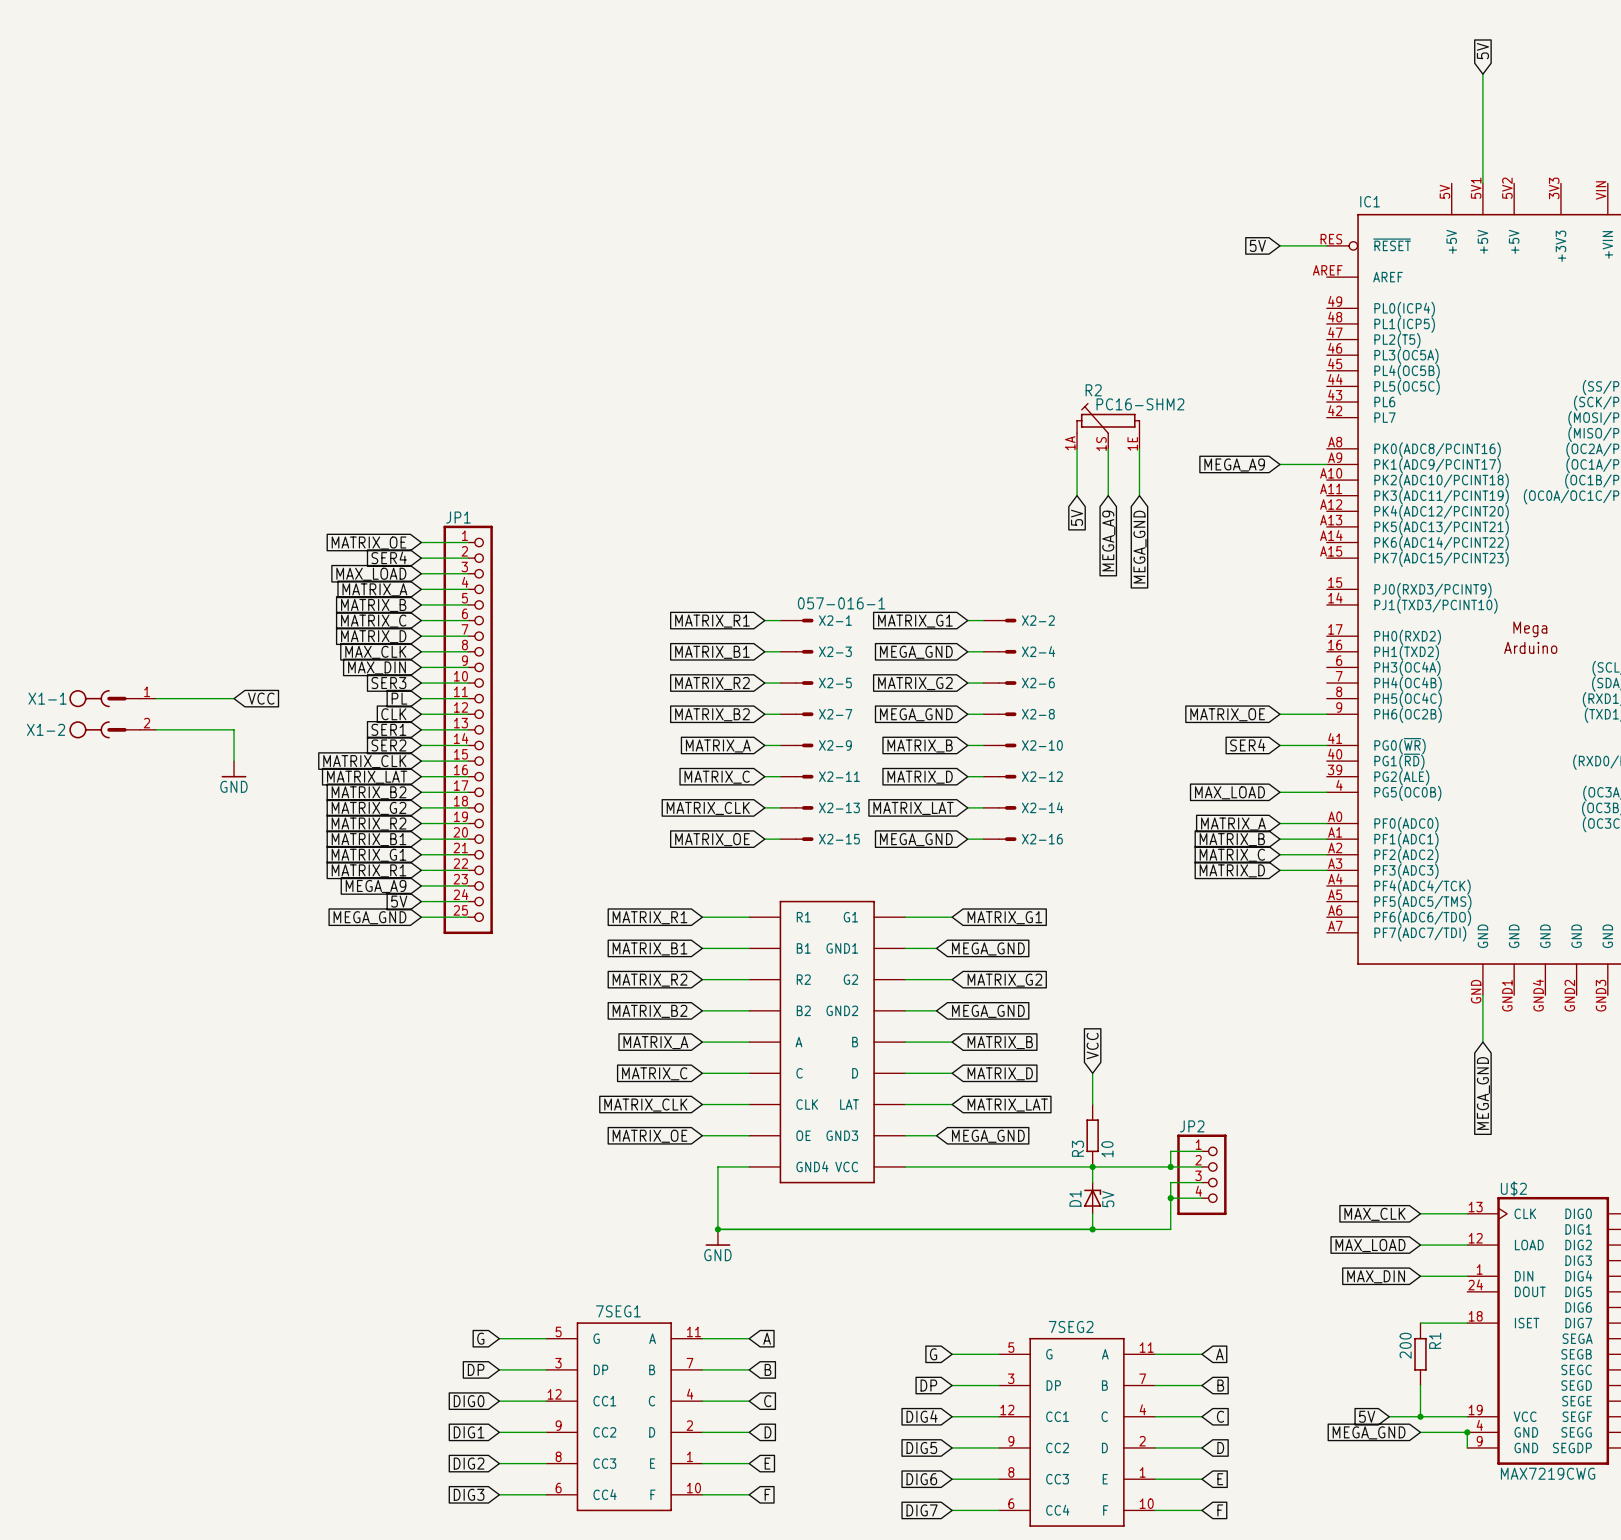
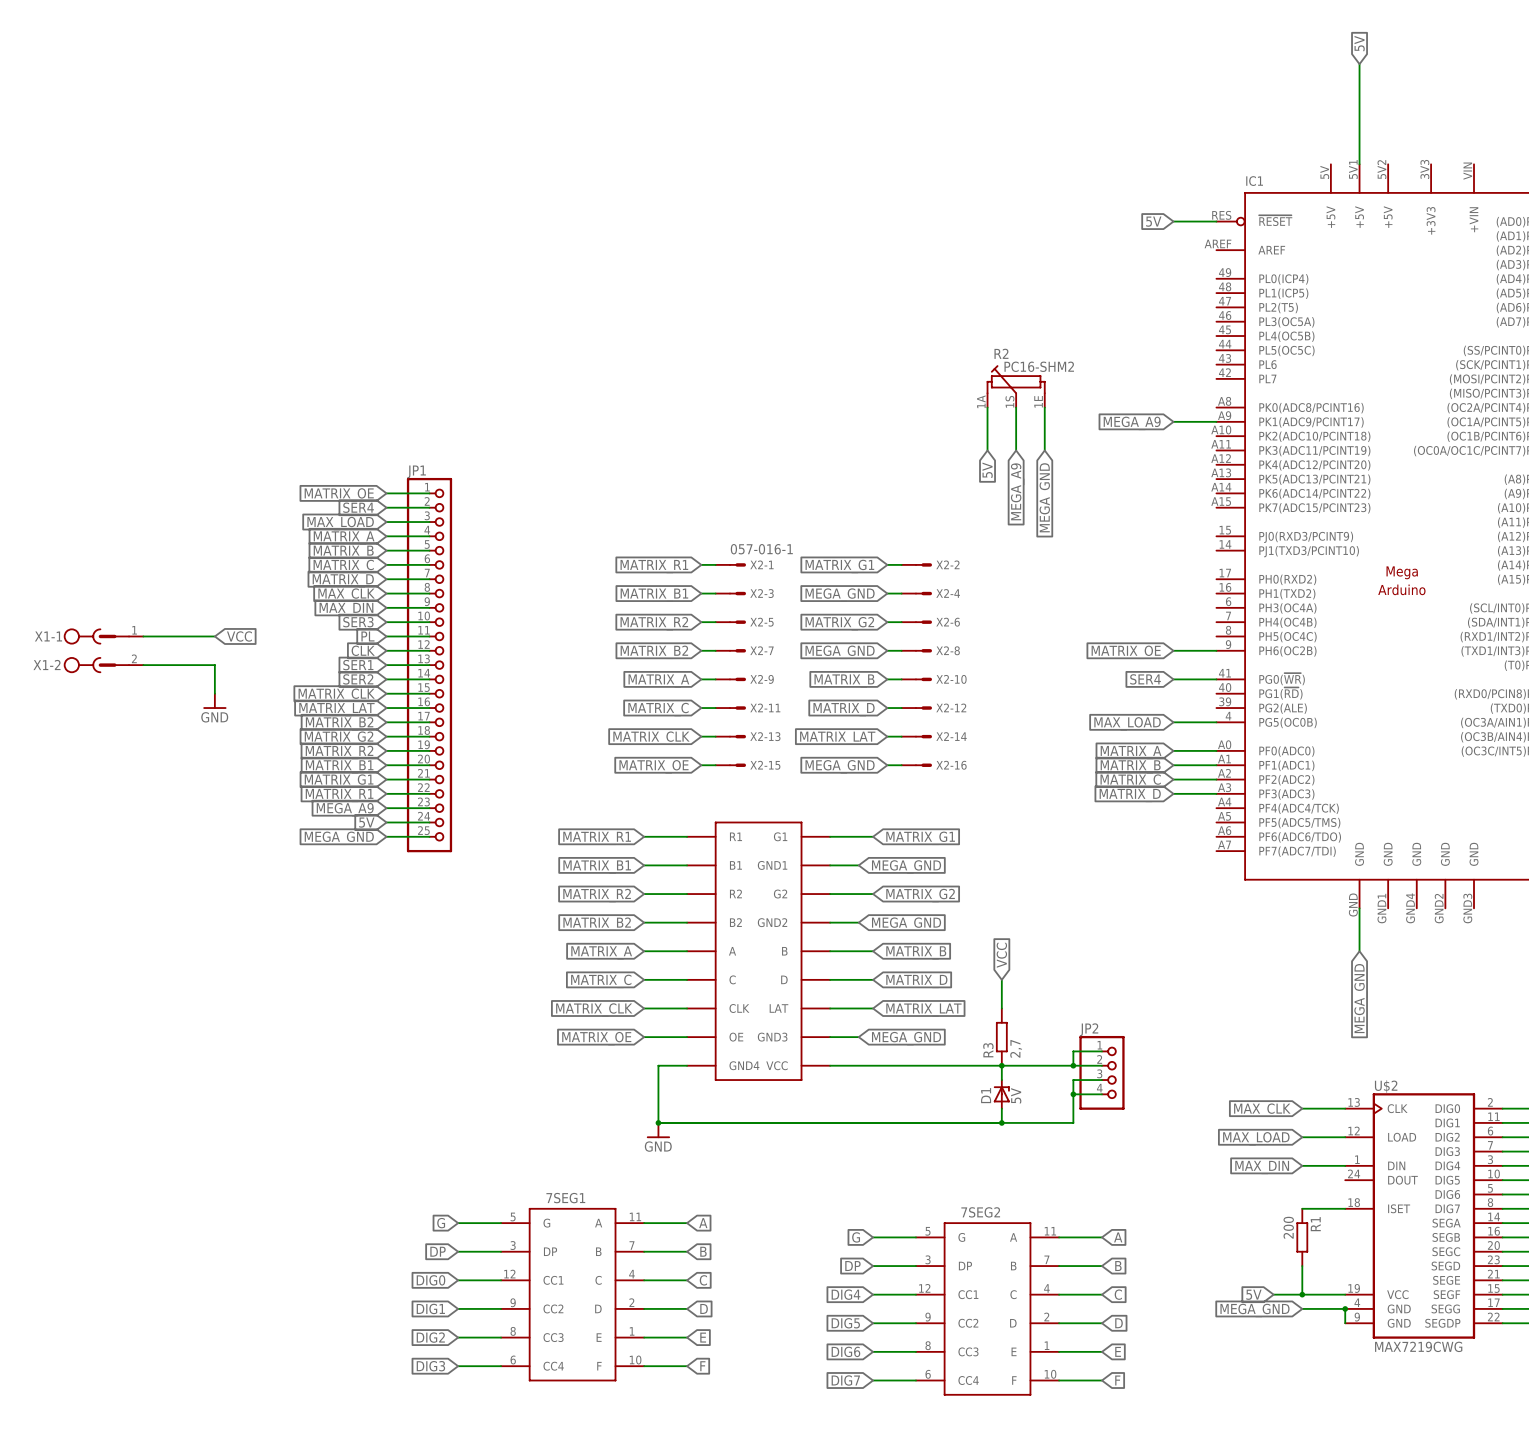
R3 value: 10 (1107, 1149) -> 2,7 (1016, 1048)

